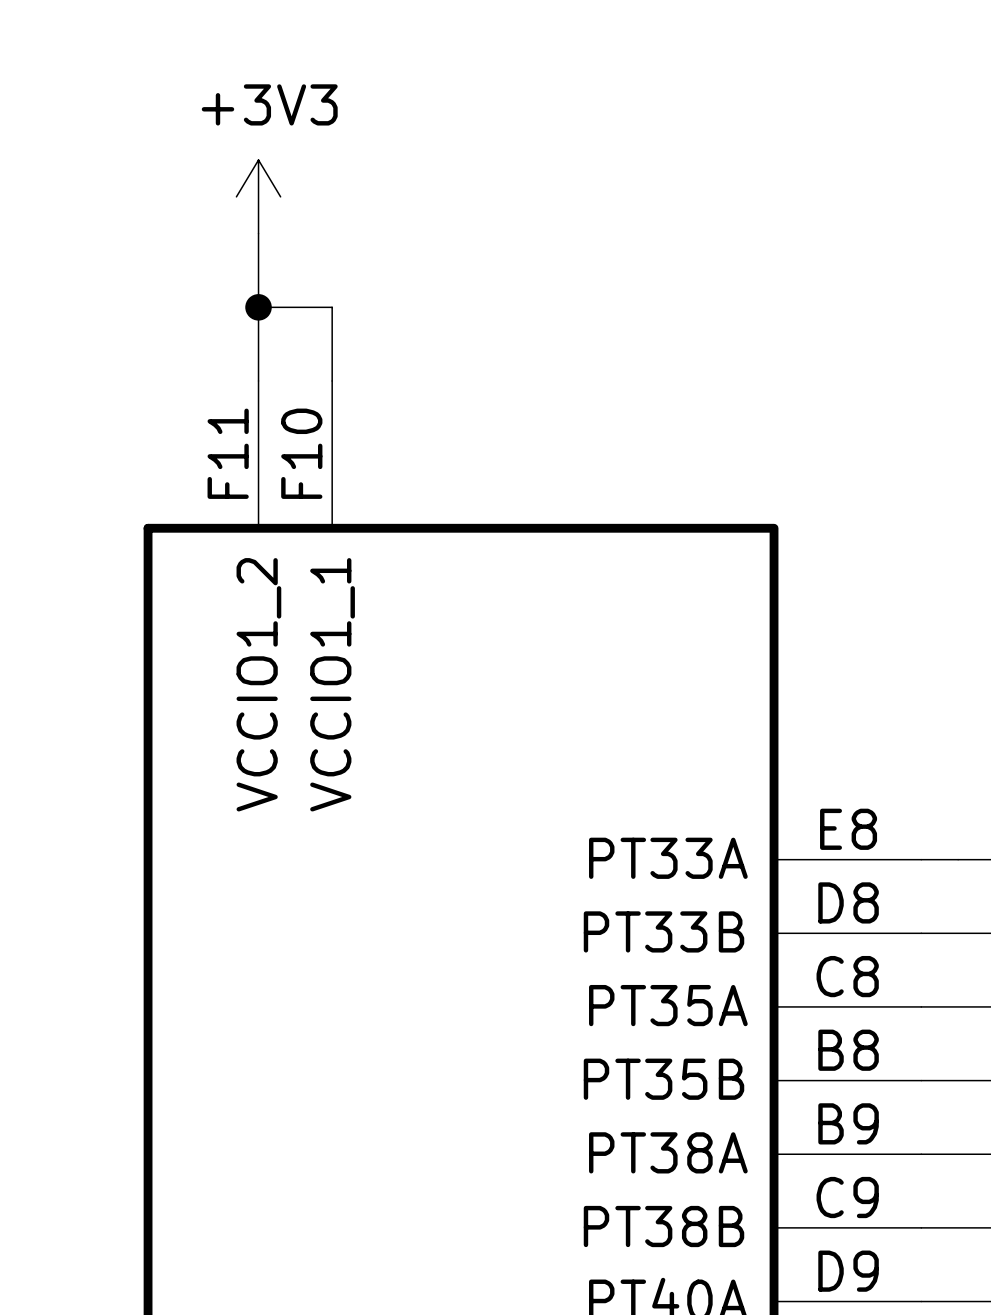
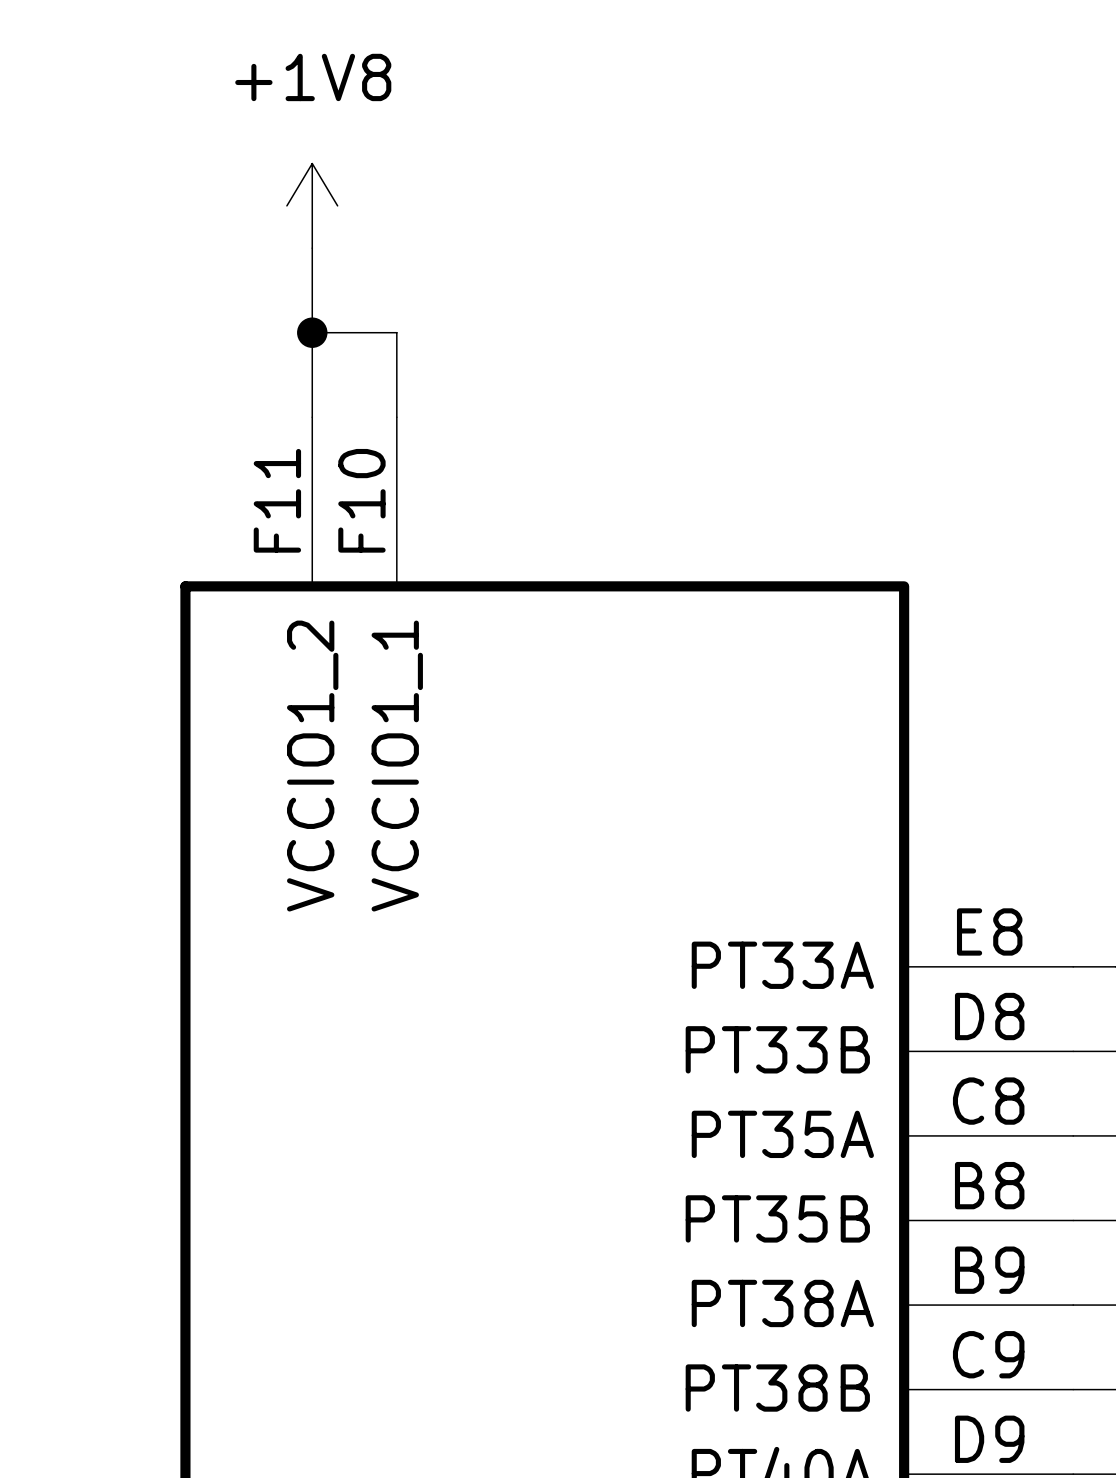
power symbol: +3V3 (258, 196) -> +1V8 (312, 205)

